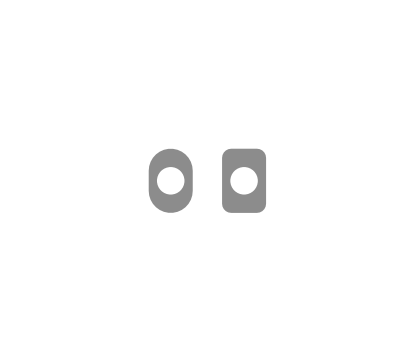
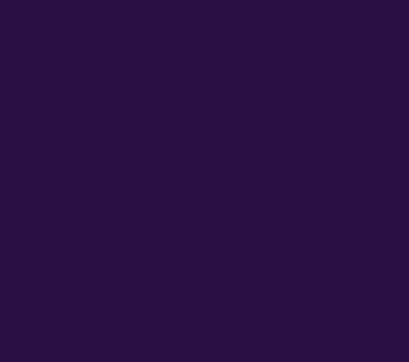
part: (207, 180) -> none

